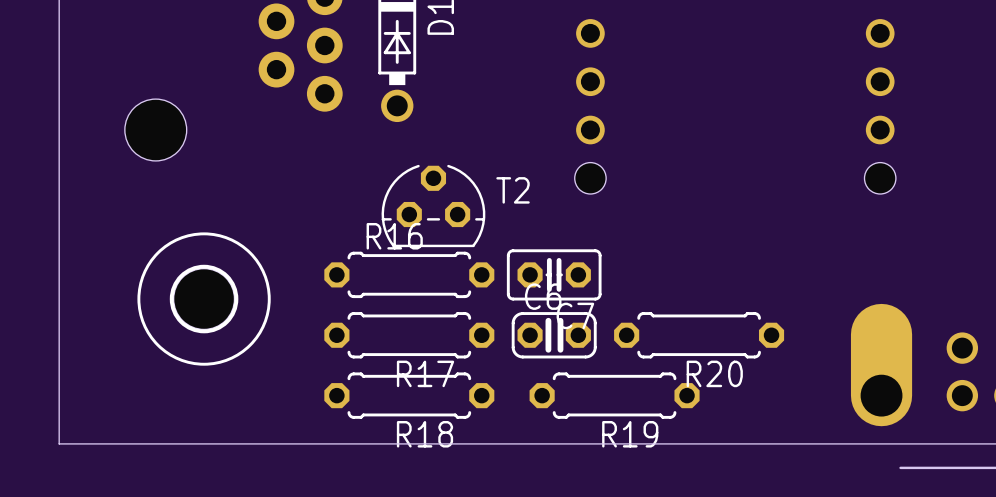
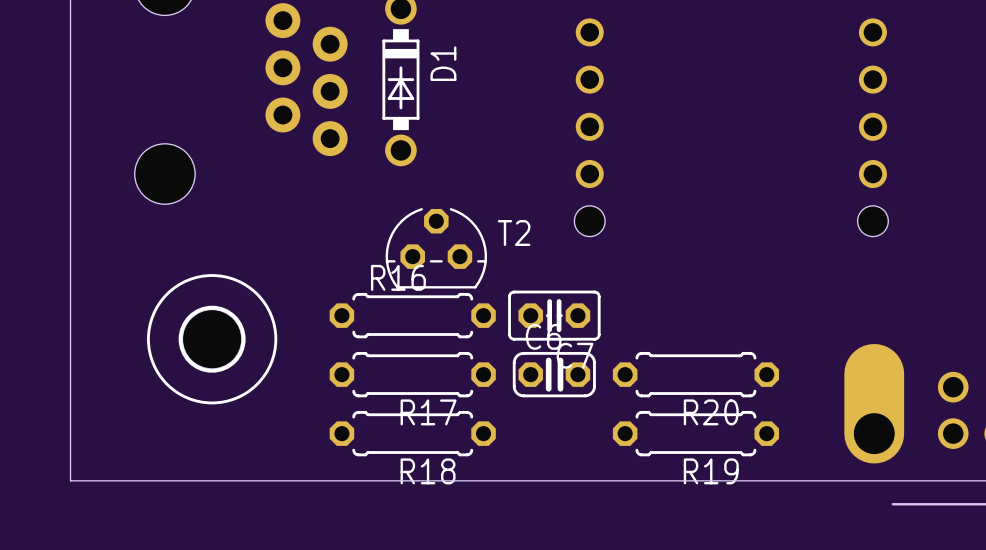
R19 position: (614, 395) -> (695, 433)

